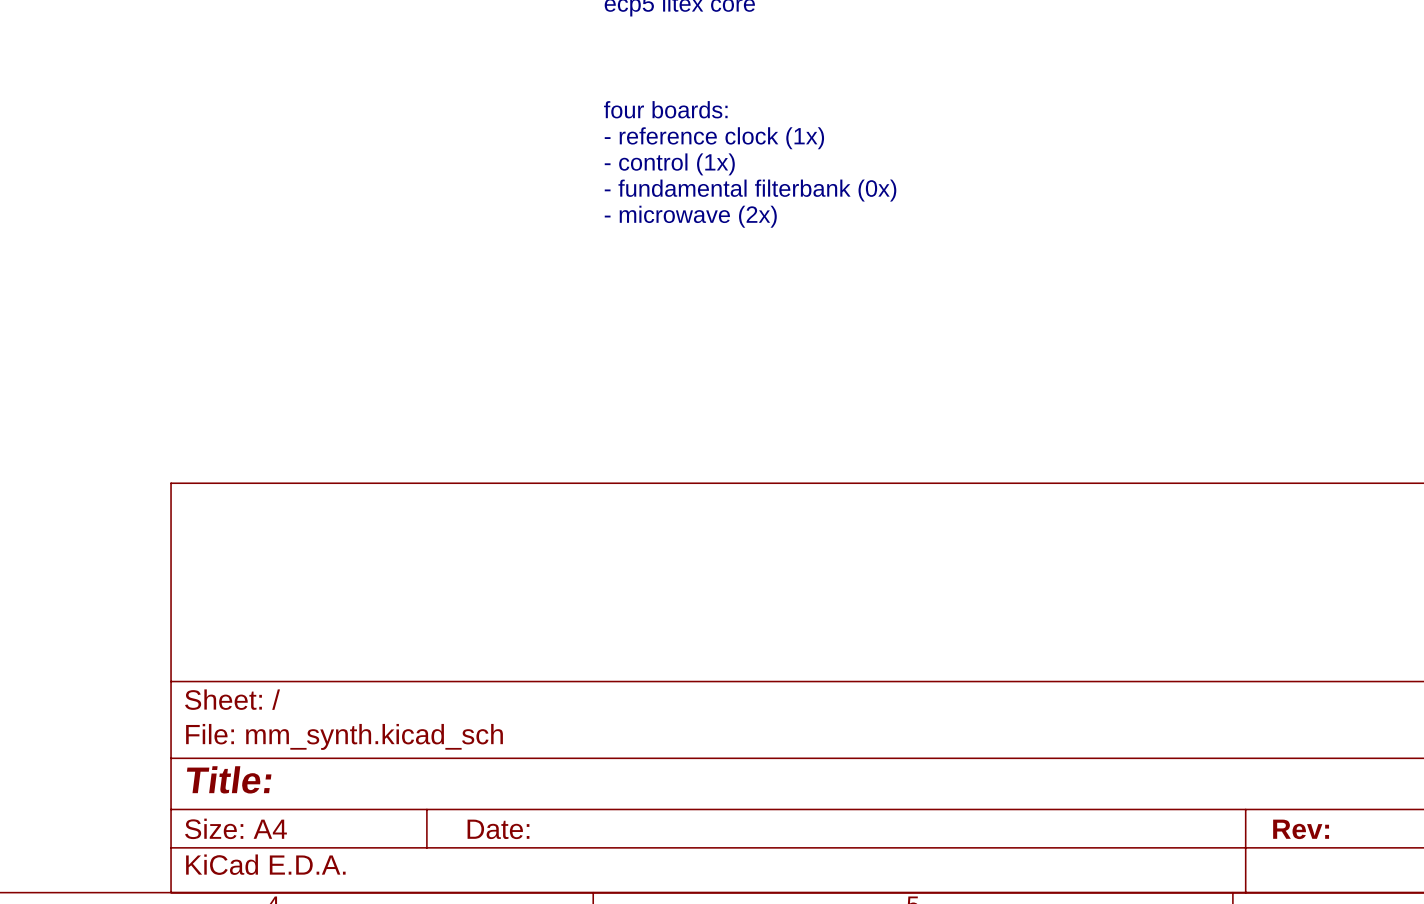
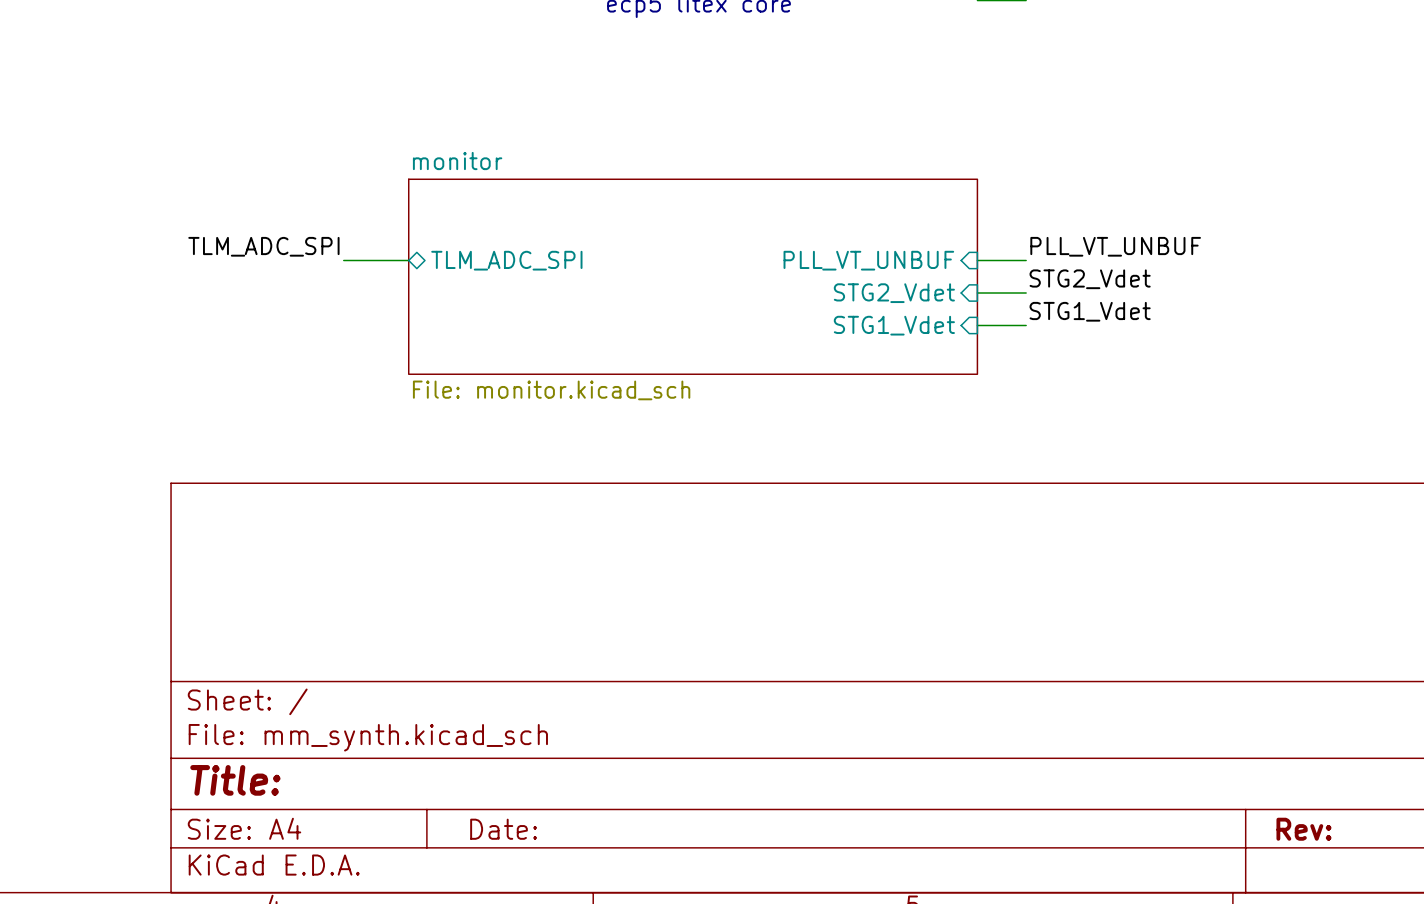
wire: none -> (977, 0) (1026, 0)
text: four boards: (665, 109) -> none
text: - reference clock (1x) (714, 138) -> none
text: - control (1x) (669, 164) -> none
text: - fundamental filterbank (0x) (750, 190) -> none
text: - microwave (2x) (690, 216) -> none
label: none -> TLM_ADC_SPI (263, 246)
label: none -> PLL_VT_UNBUF (1115, 246)
wire: none -> (343, 260) (408, 260)
wire: none -> (977, 260) (1026, 260)
sheet pin: none -> TLM_ADC_SPI (506, 260)
sheet pin: none -> PLL_VT_UNBUF (868, 260)
sheet monitor: none -> File: monitor.kicad_sch (693, 276)
label: none -> STG2_Vdet (1090, 279)
wire: none -> (977, 293) (1026, 293)
sheet pin: none -> STG2_Vdet (894, 293)
label: none -> STG1_Vdet (1090, 311)
wire: none -> (977, 325) (1026, 325)
sheet pin: none -> STG1_Vdet (894, 325)

